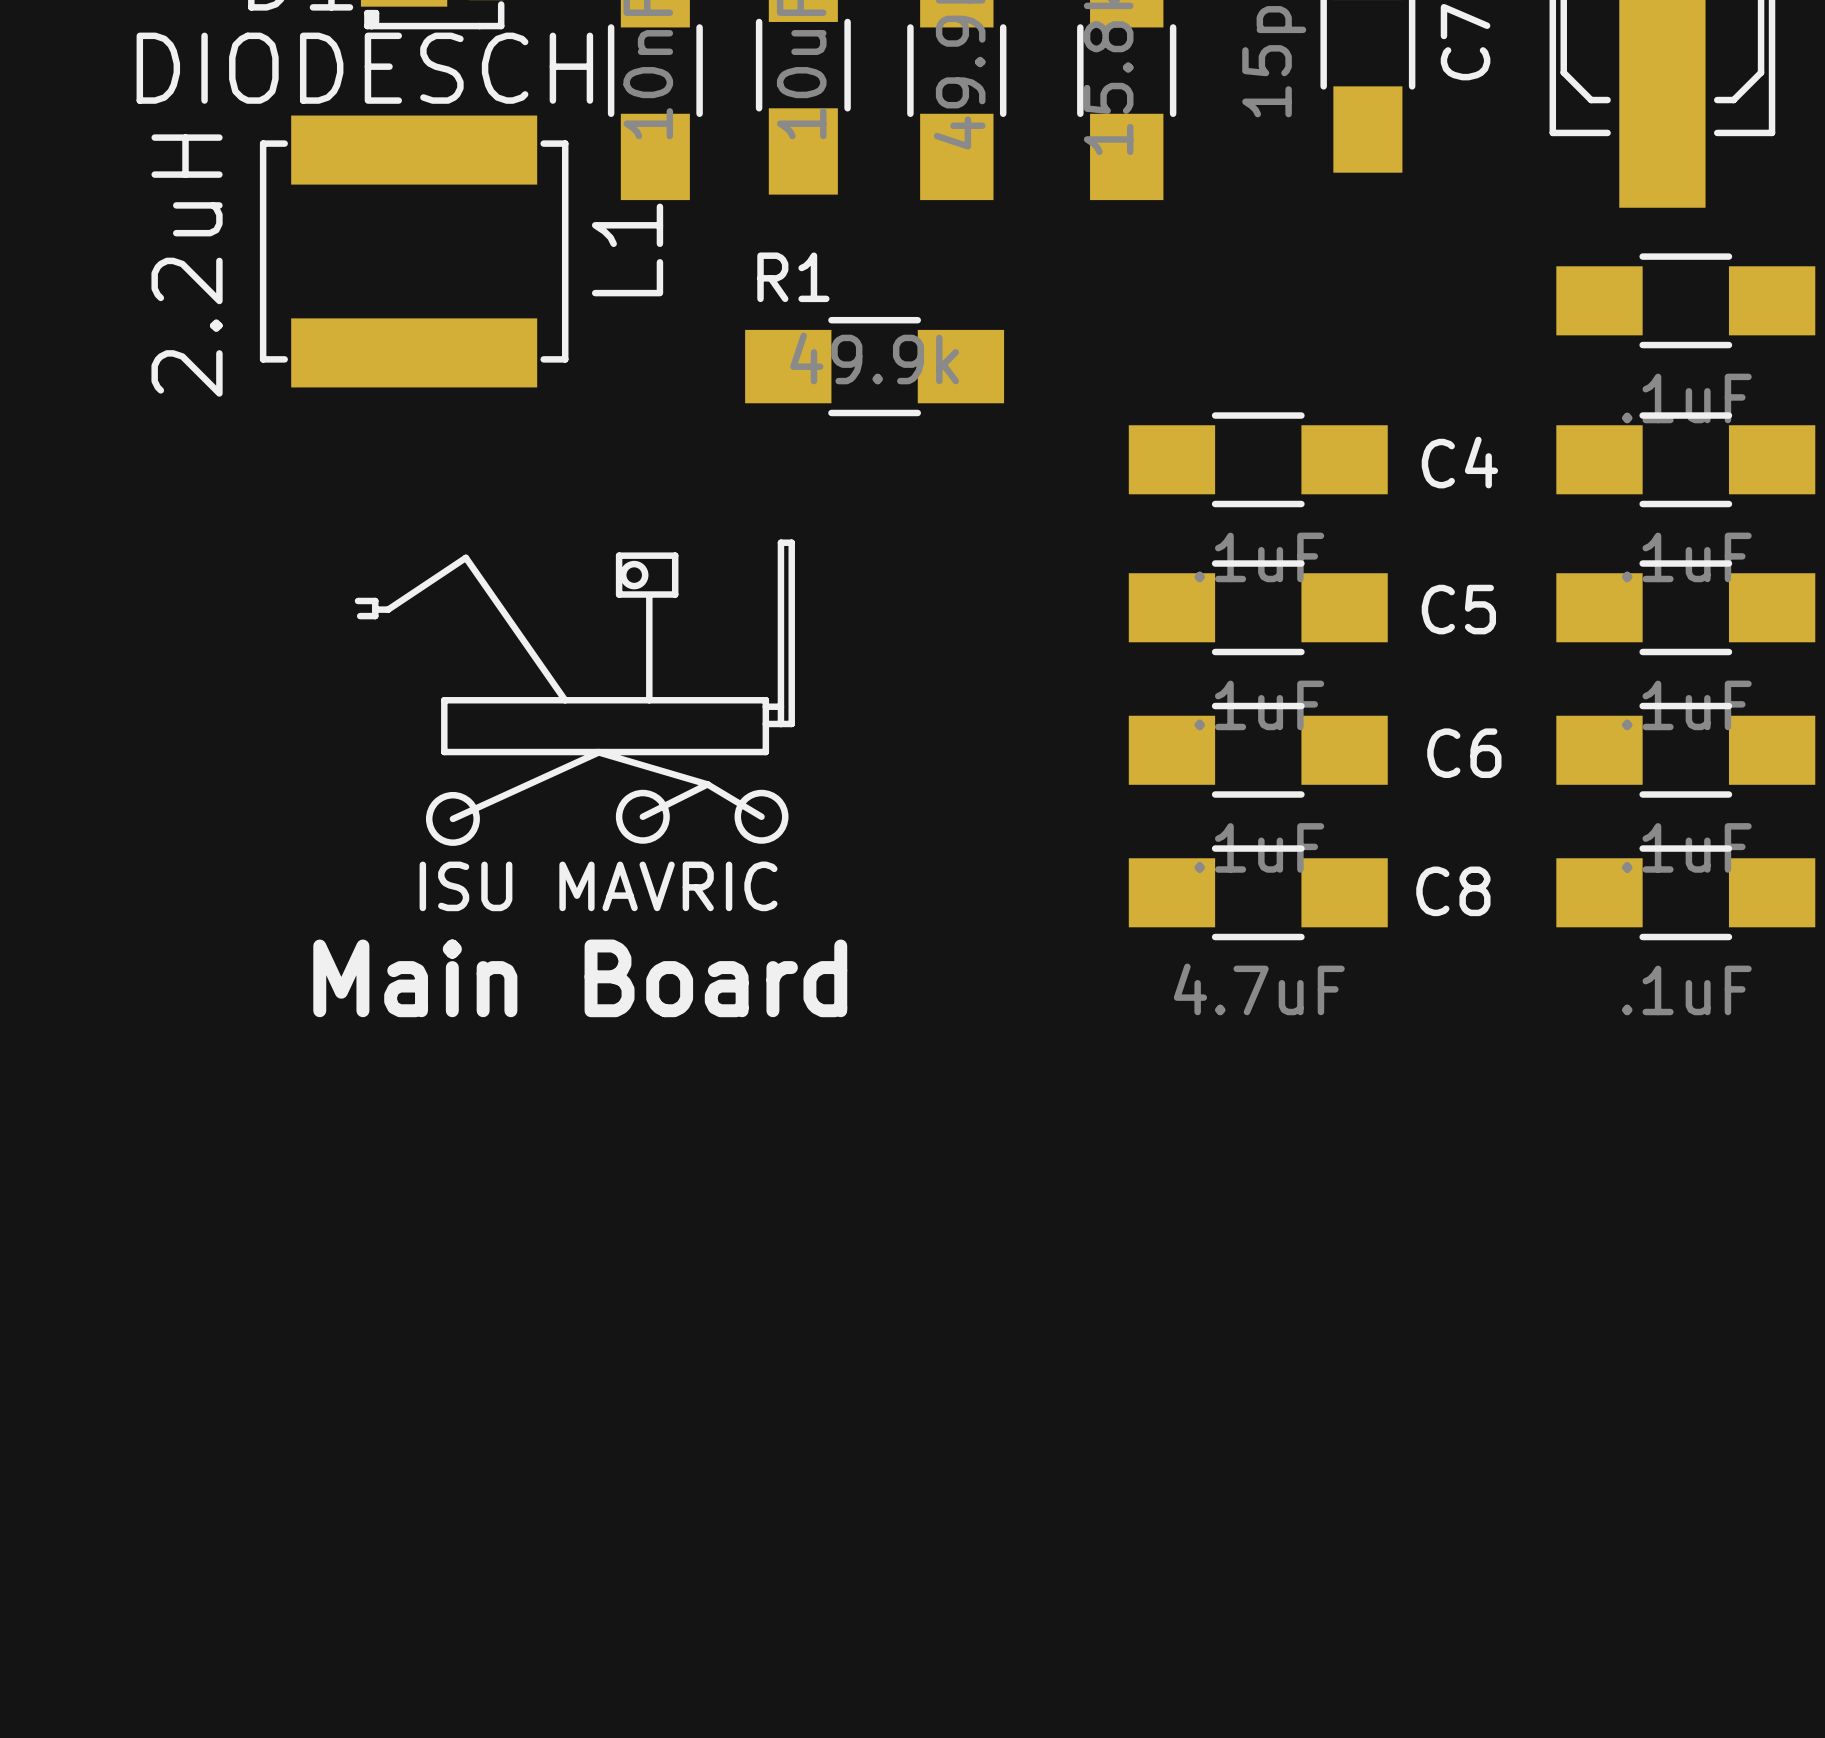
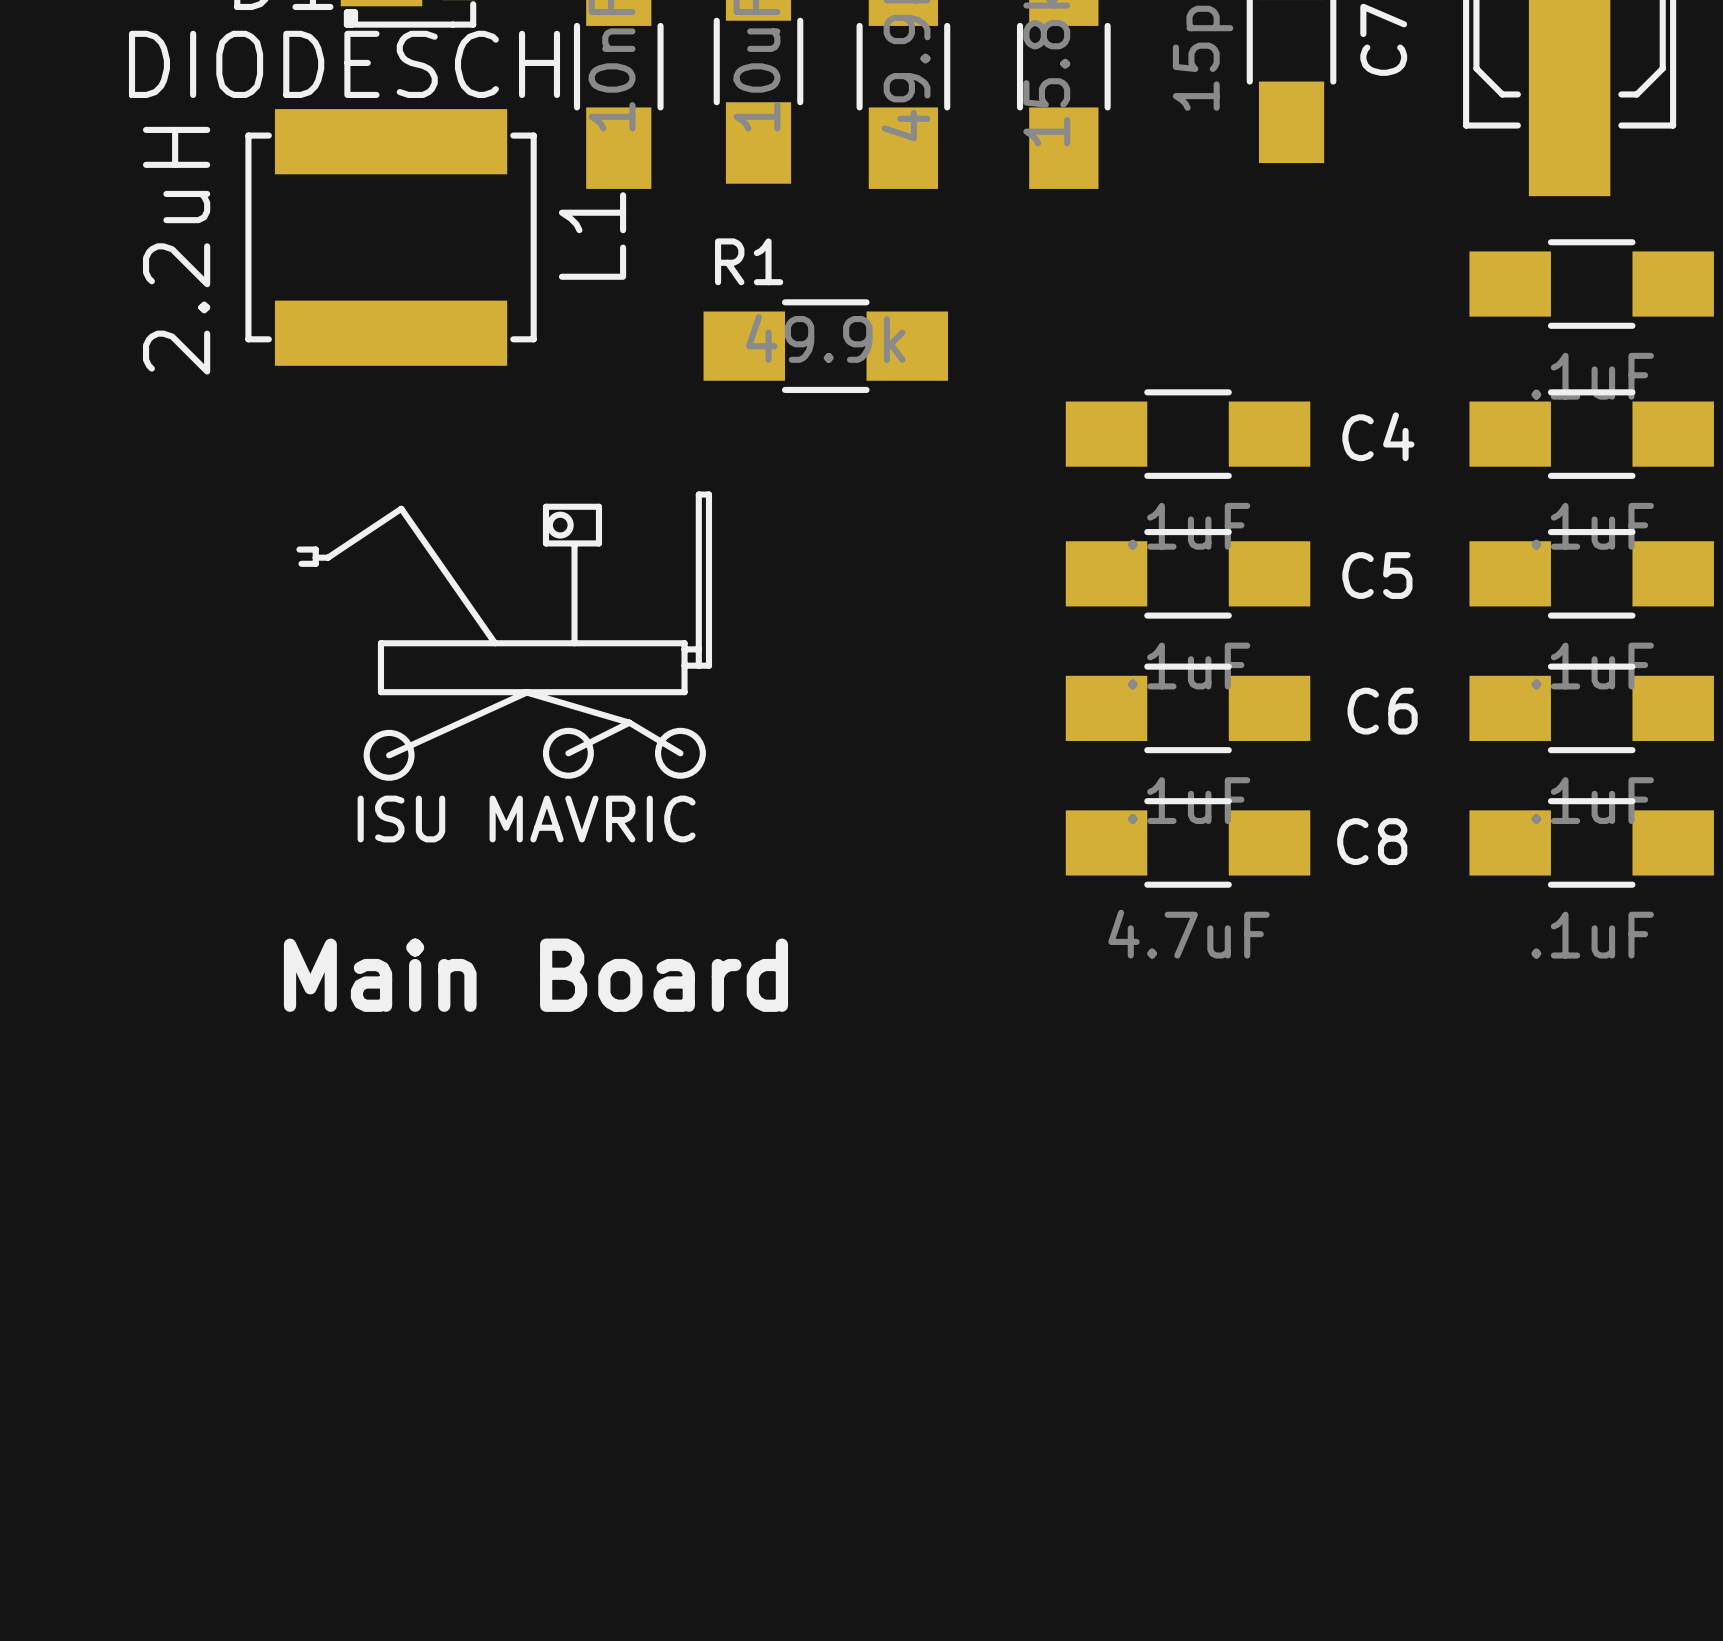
ISU MAVRIC position: (574, 692) -> (504, 636)
text position: Main Board (580, 978) -> Main Board (535, 975)

